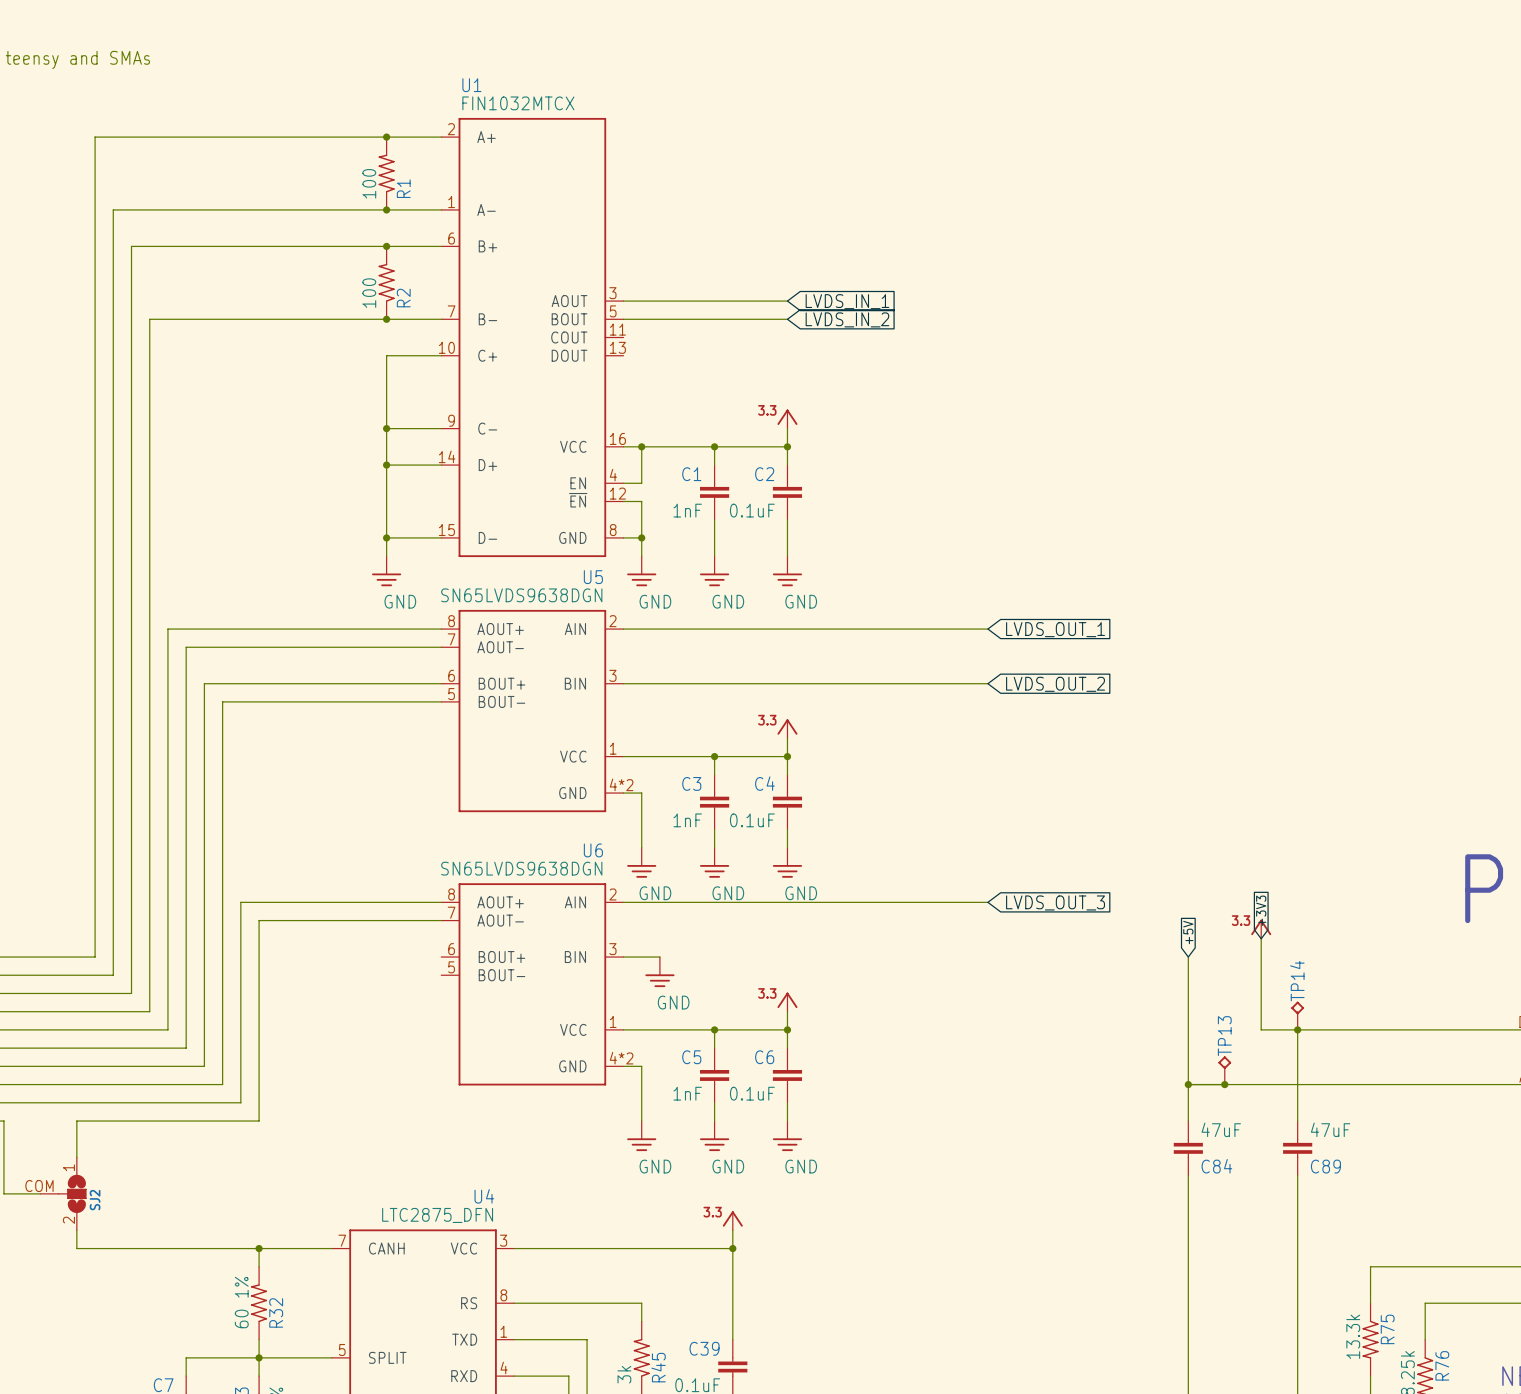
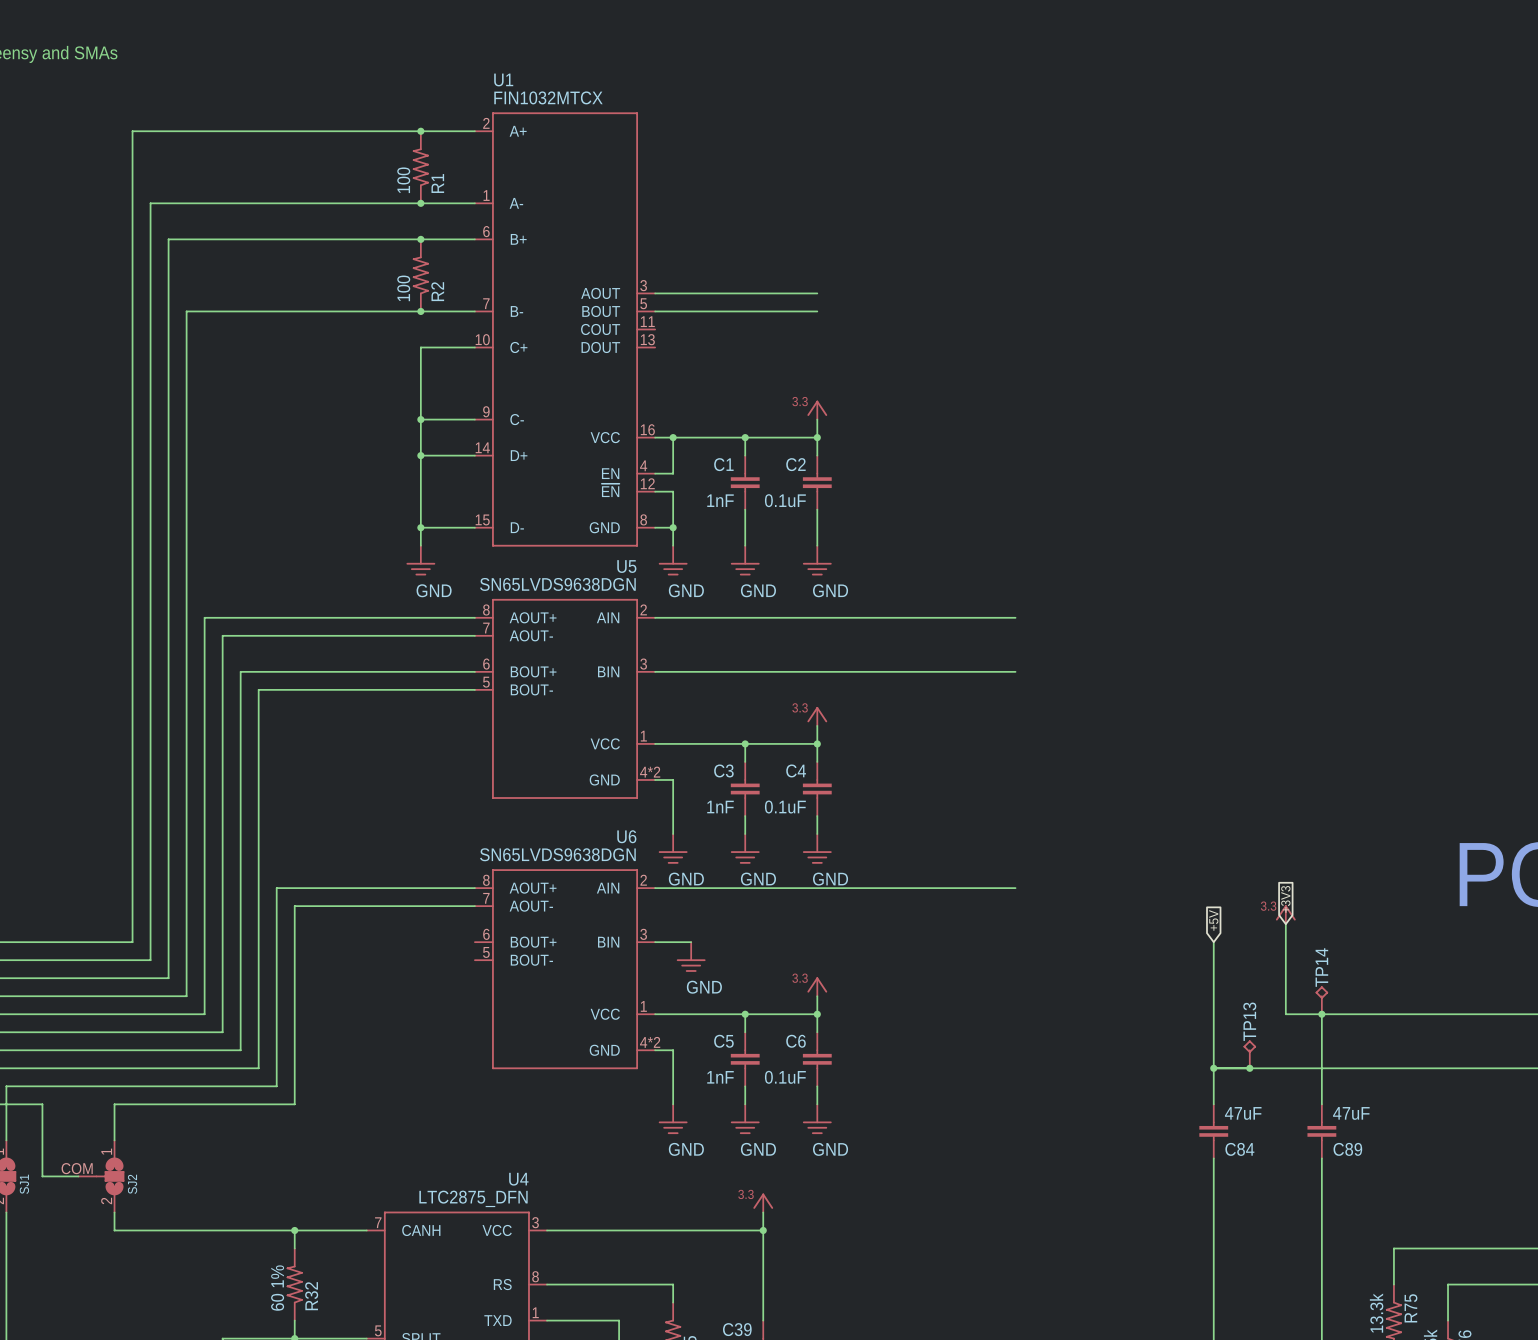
global label: LVDS_IN_1 (847, 301) -> none
global label: LVDS_IN_2 (847, 319) -> none
global label: LVDS_OUT_1 (1055, 629) -> none
global label: LVDS_OUT_2 (1055, 684) -> none
global label: LVDS_OUT_3 (1055, 902) -> none

